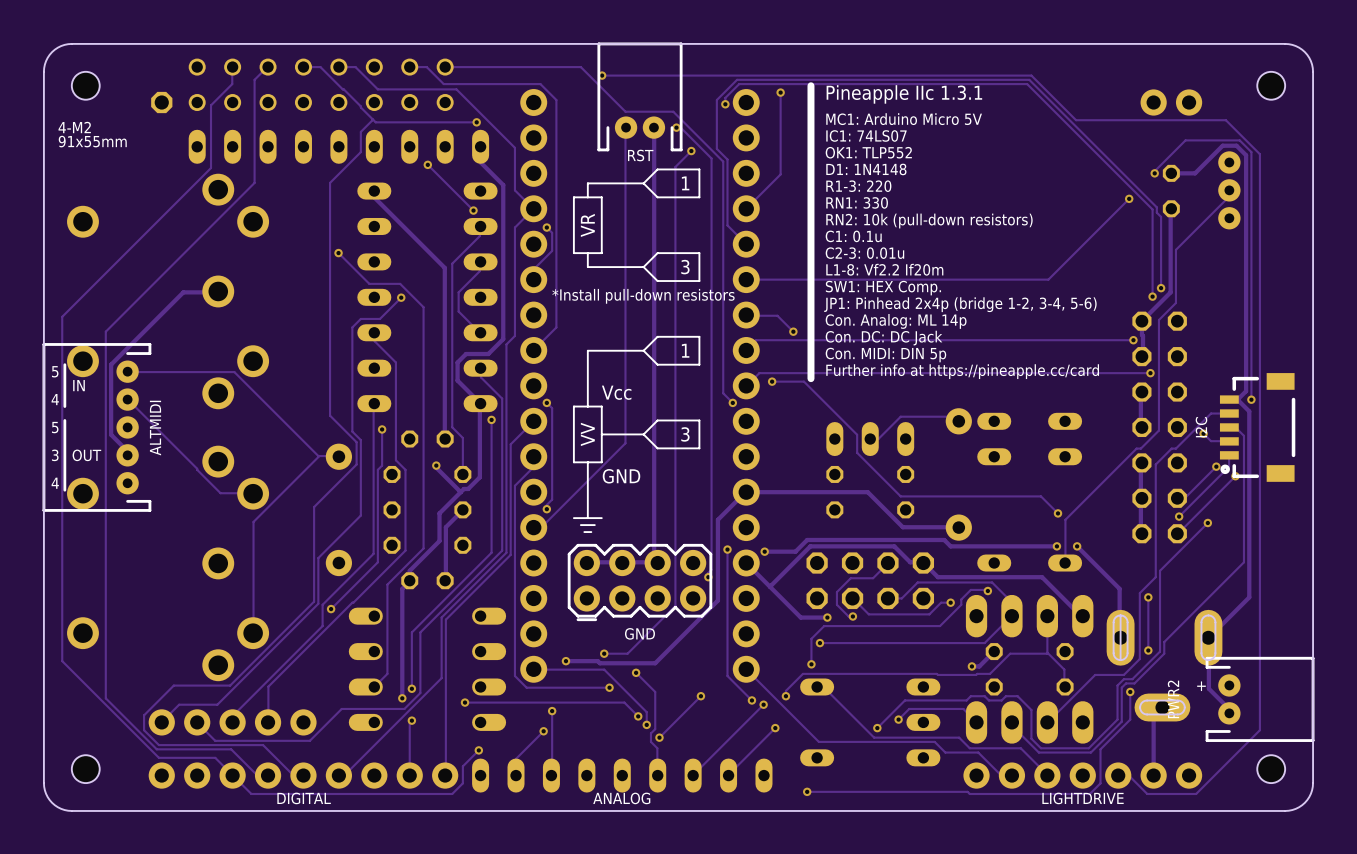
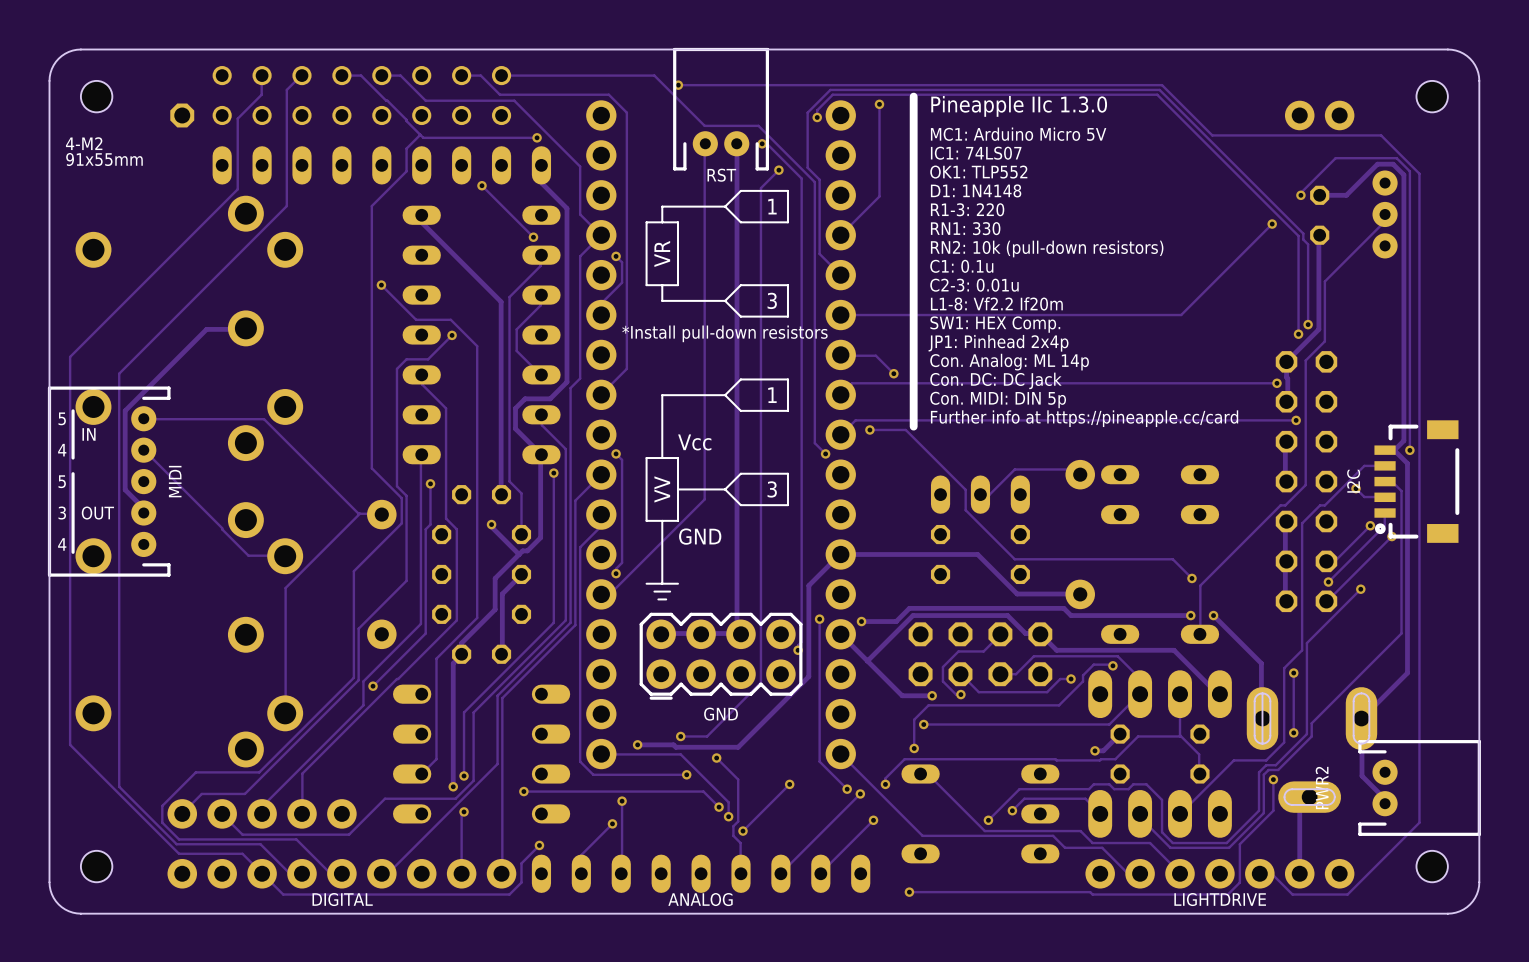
text: Pineapple IIc 1.3.1 (904, 94) -> Pineapple IIc 1.3.0 (1019, 106)
text: JP1: Pinhead 2x4p (bridge 1-2, 3-4, 5-6) (960, 304) -> JP1: Pinhead 2x4p (998, 343)
ALTMIDI name: ALTMIDI (155, 428) -> MIDI (175, 481)
text: + (1201, 686) -> none

